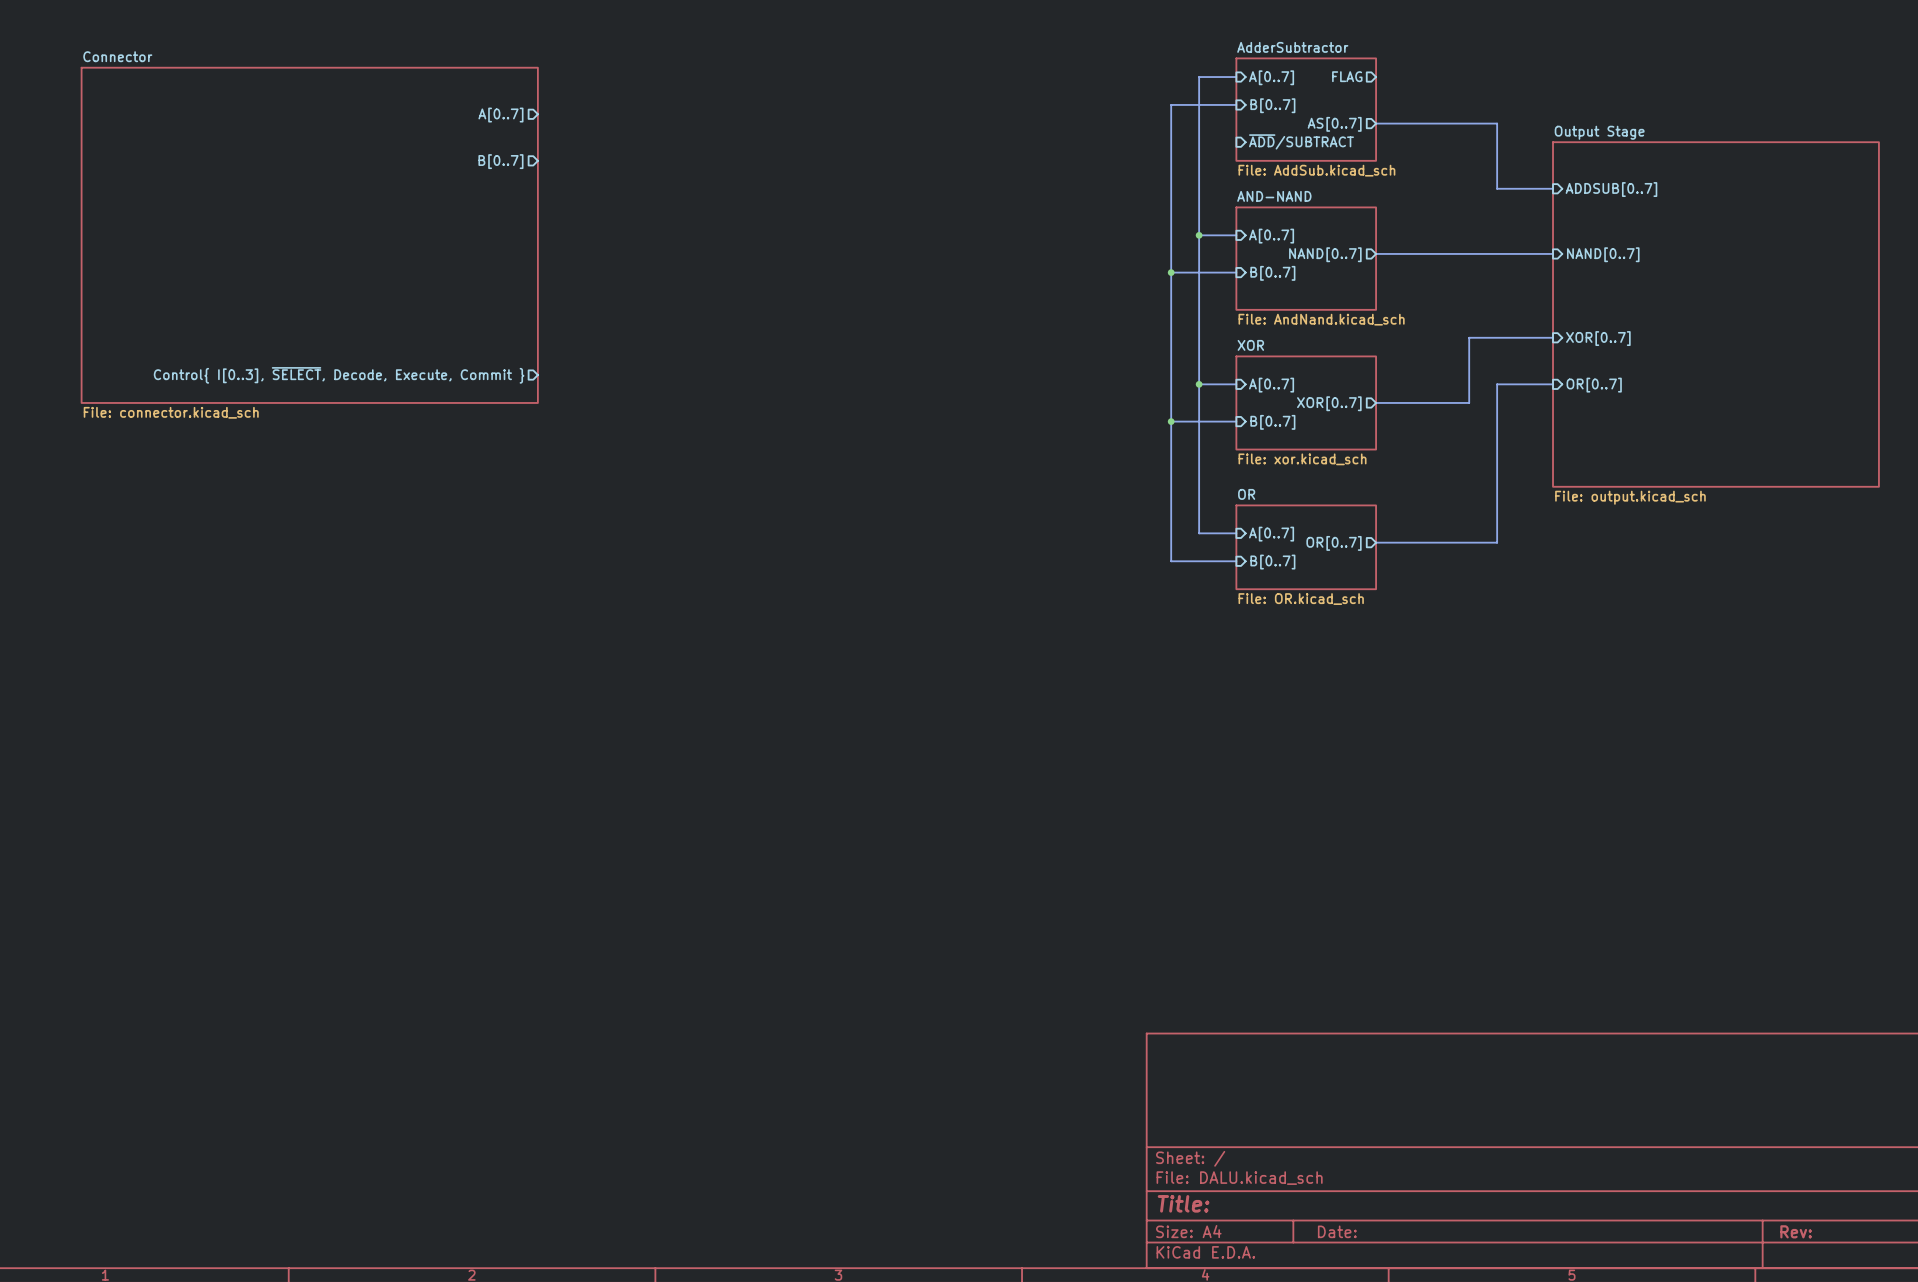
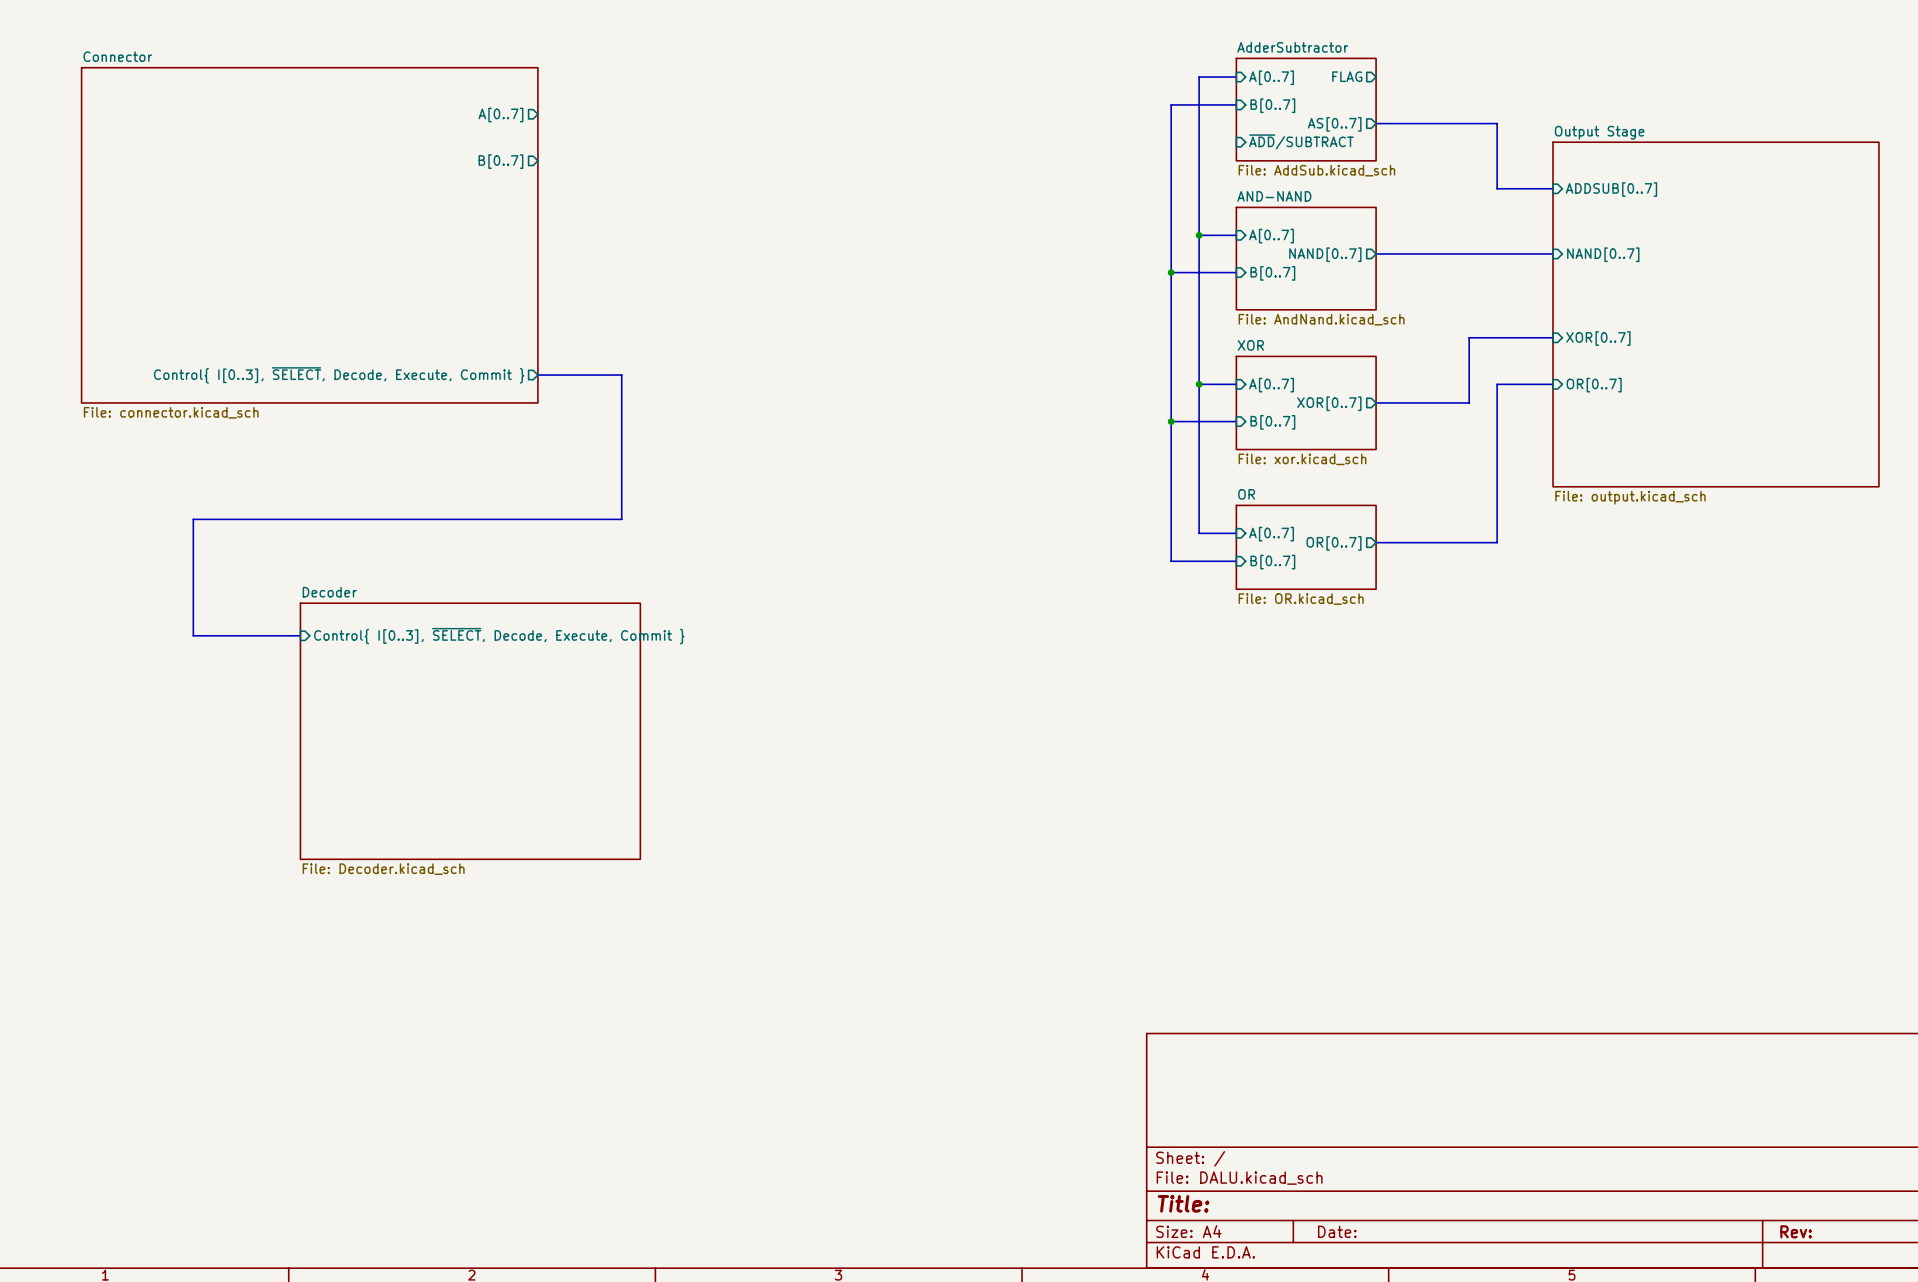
bus: none -> (537, 375) (621, 375) (621, 519) (193, 519) (193, 635) (300, 635)
sheet pin: none -> Control{ I[0..3], ~{SELECT}, Decode, Execute, Commit } (499, 636)
sheet Decoder: none -> File: Decoder.kicad_sch (470, 731)

